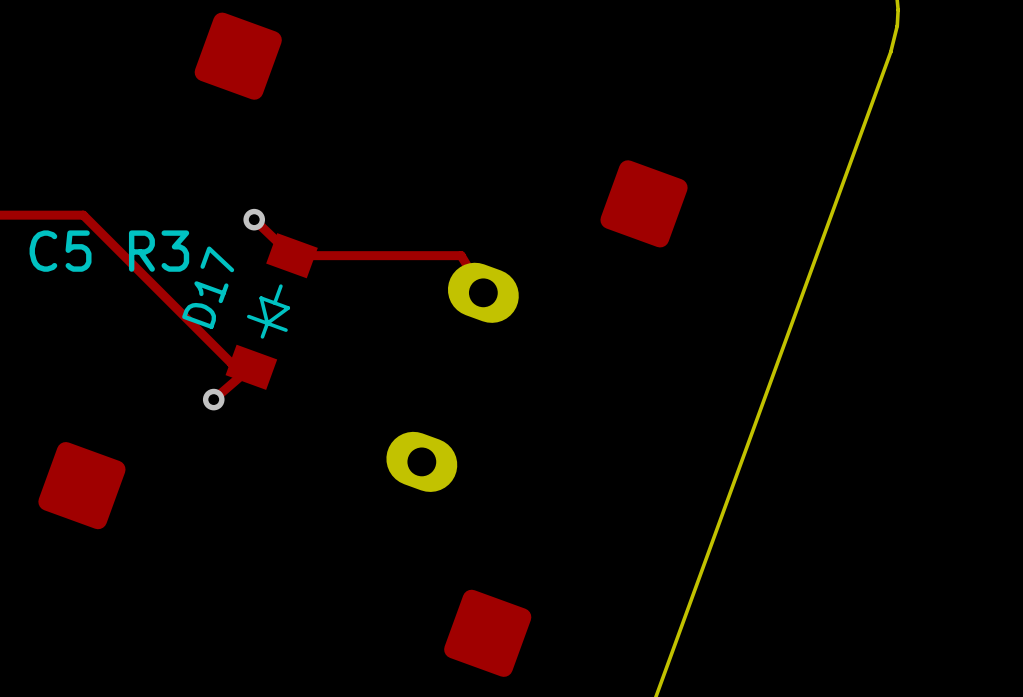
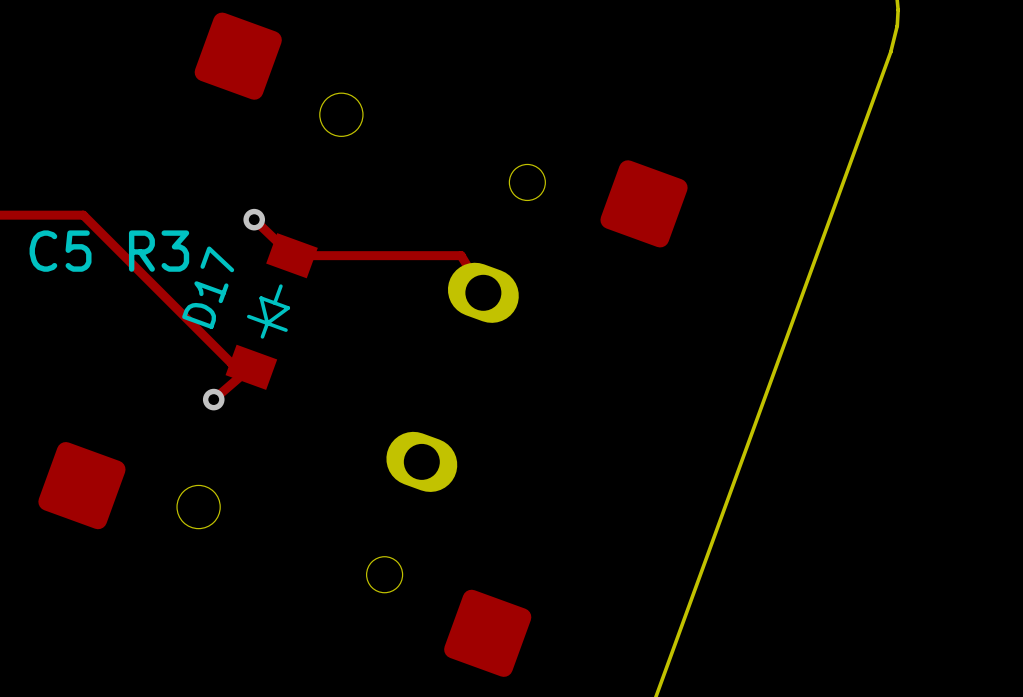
C5 R3 footprint: [38, 12, 688, 677] -> [38, 12, 688, 677]

